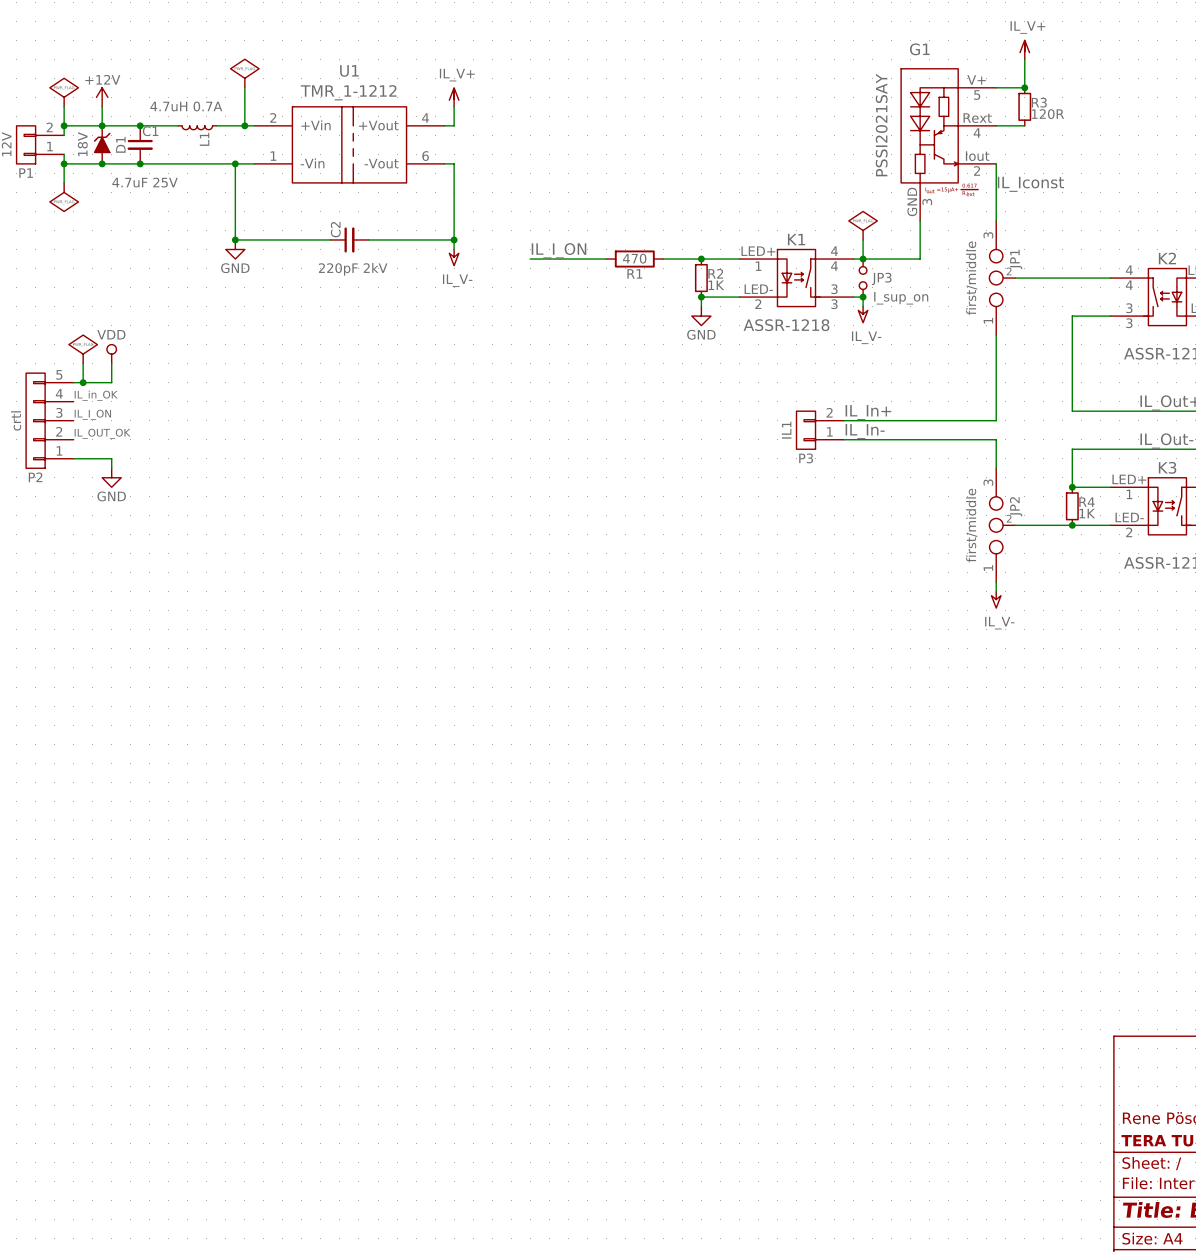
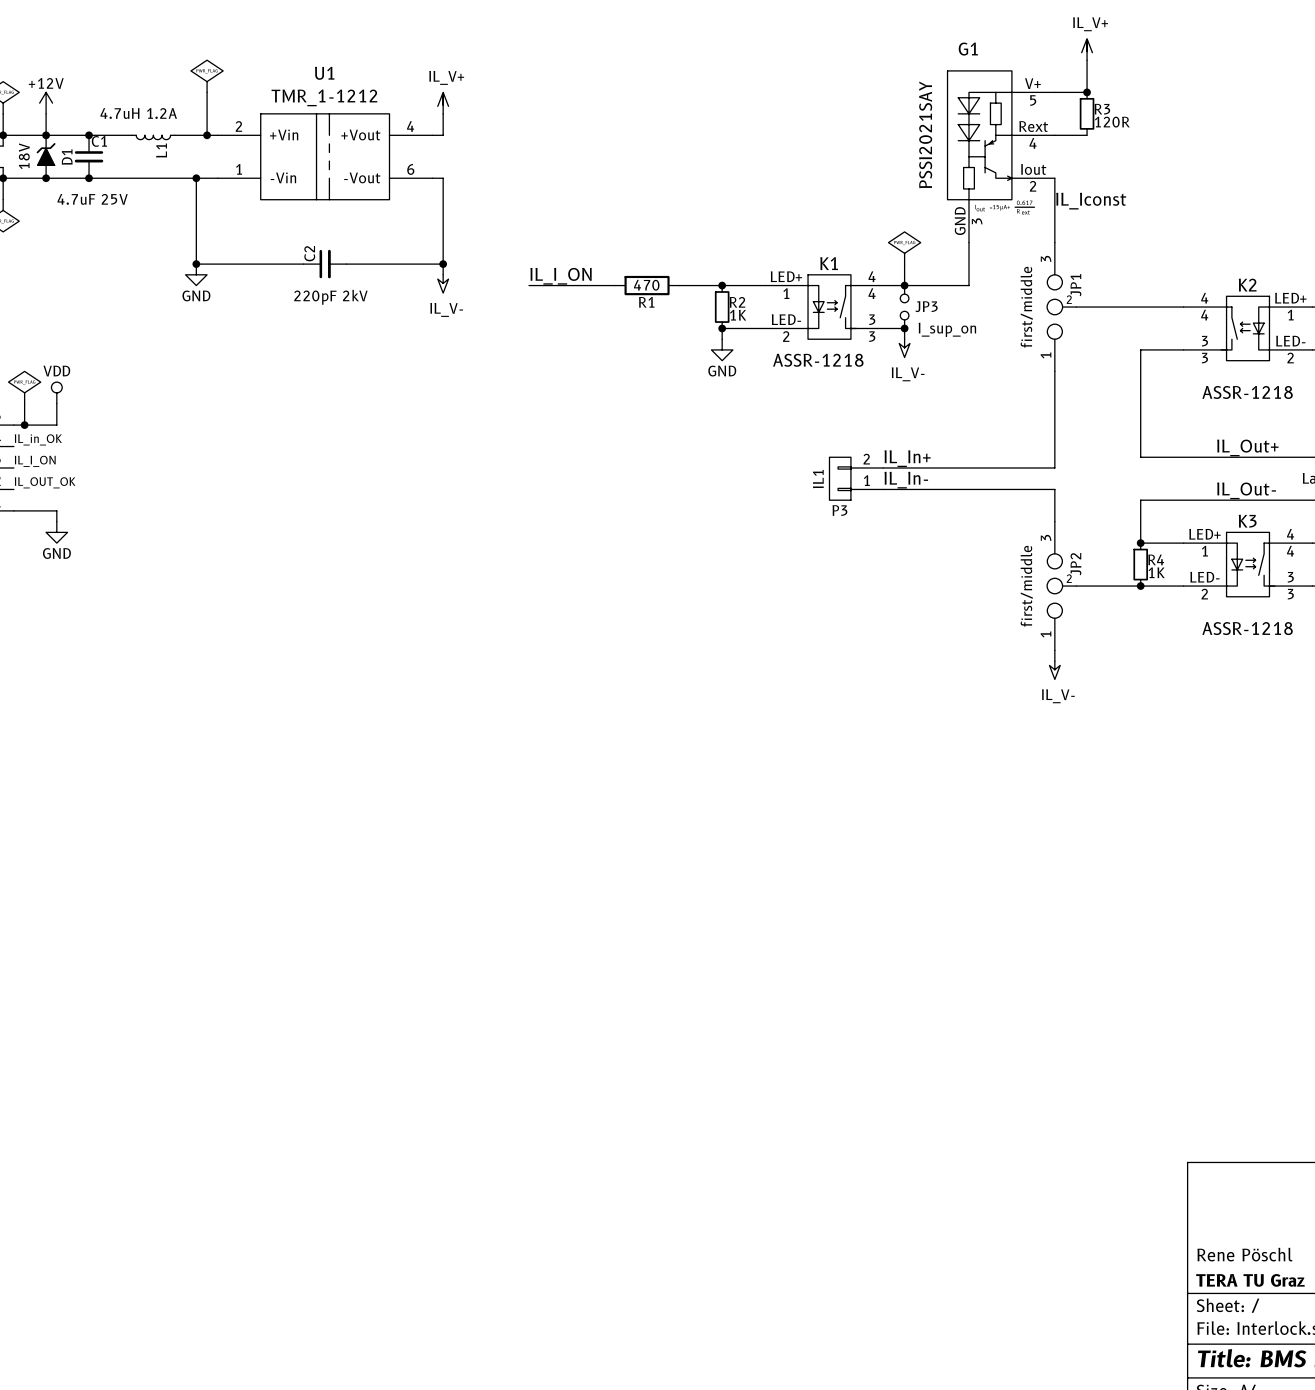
L1 value: 4.7uH 0.7A (186, 106) -> 4.7uH 1.2A (138, 113)

